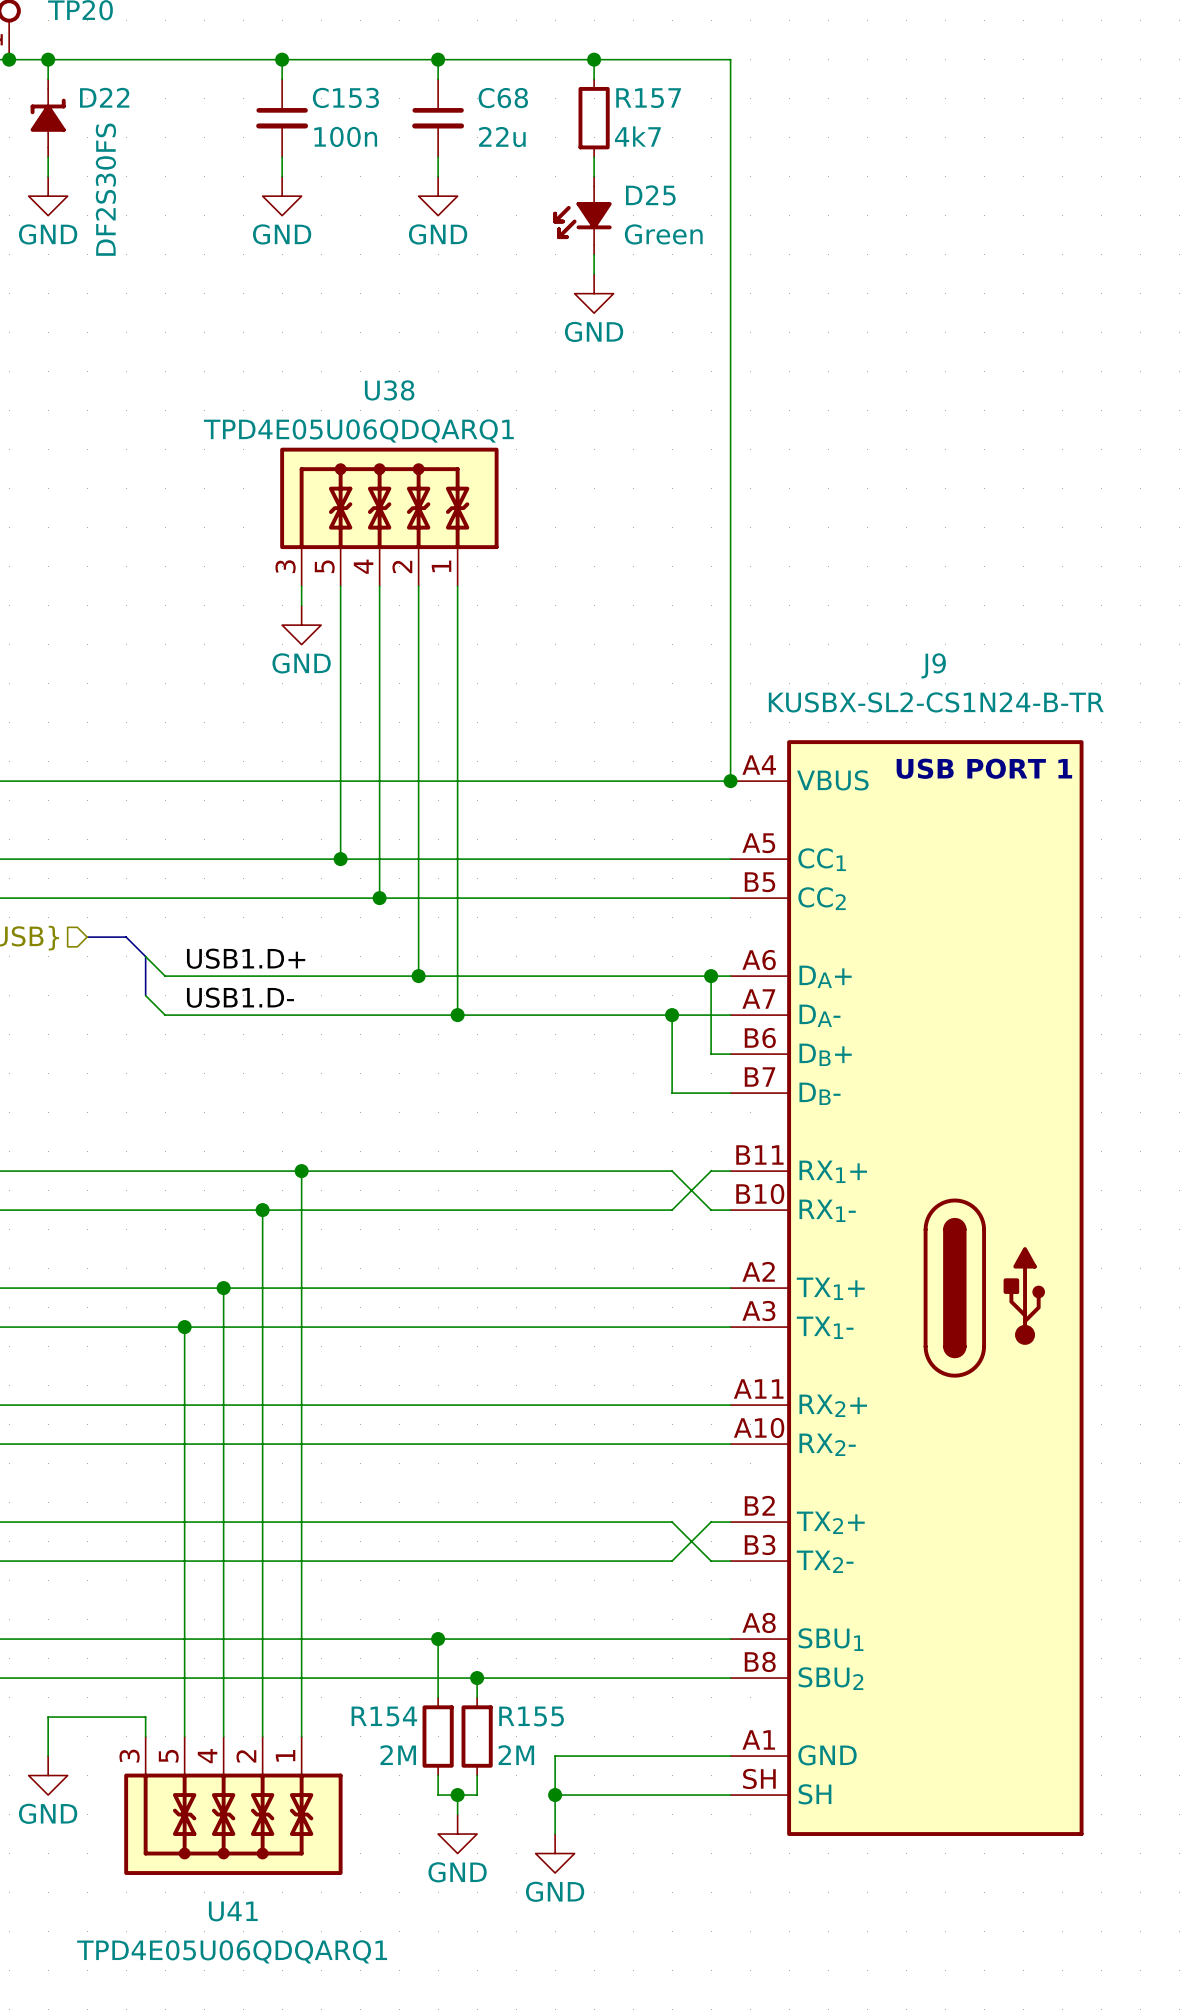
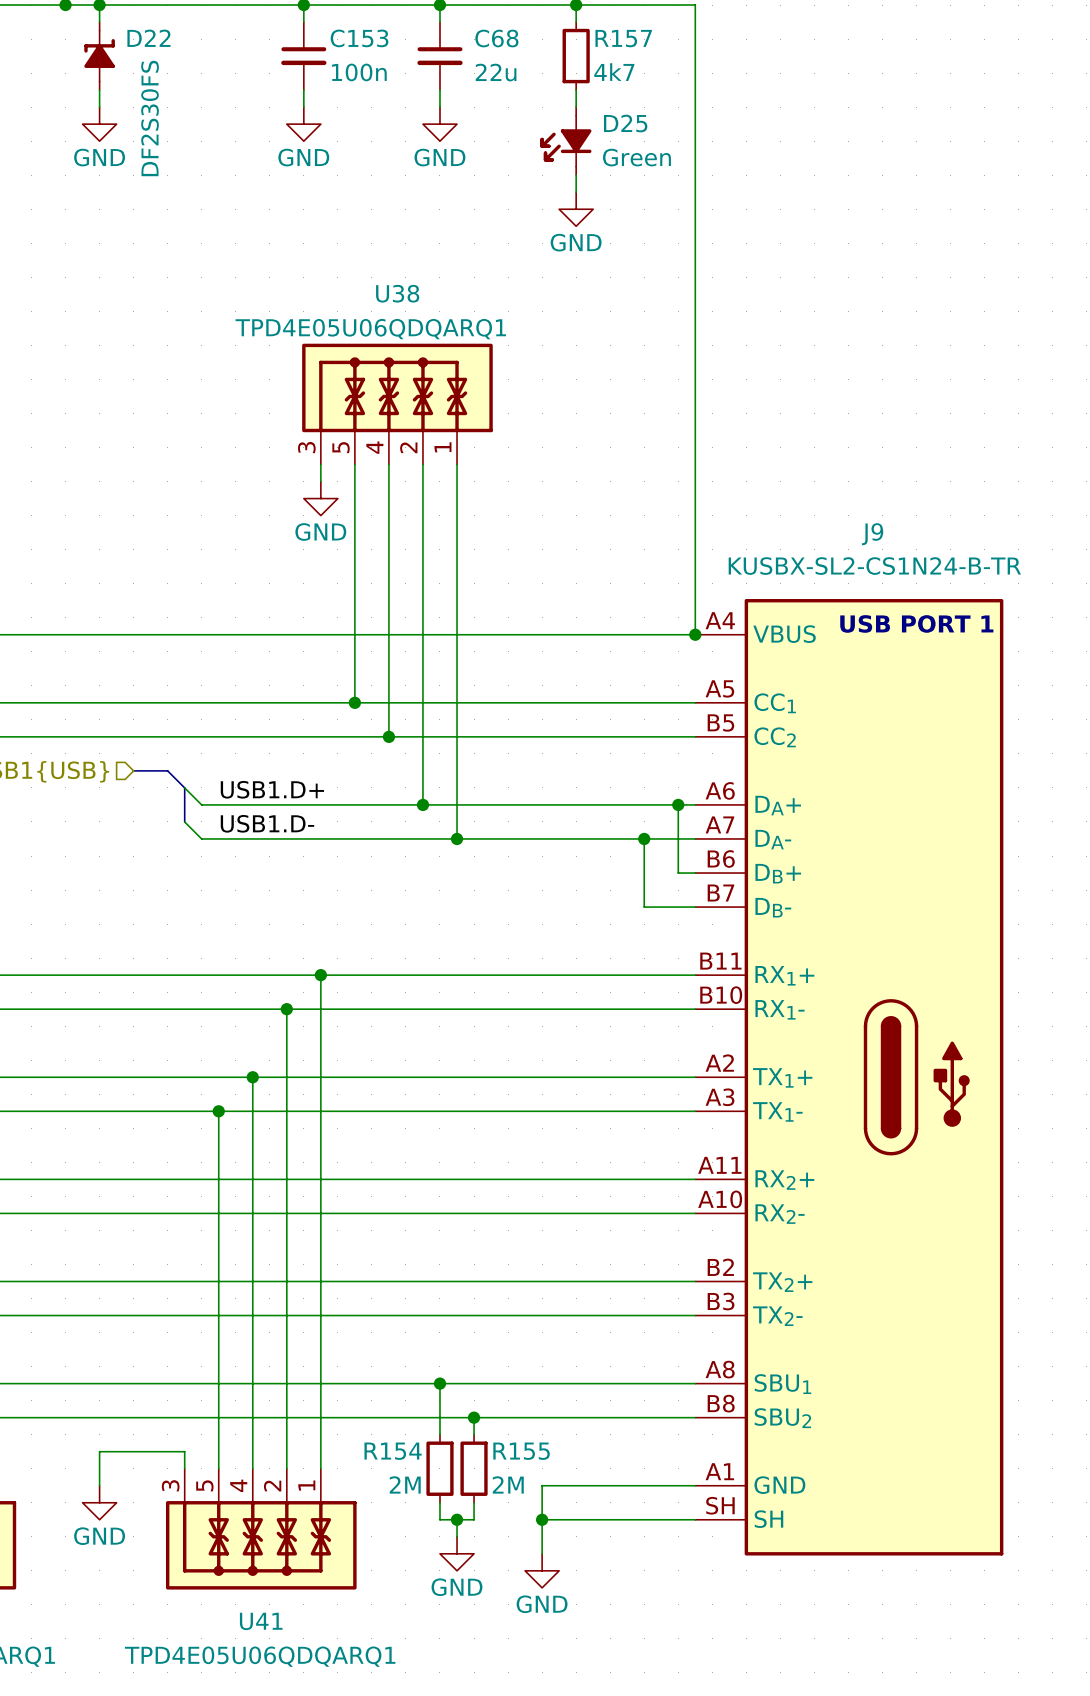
wire: (672, 1171) (711, 1210) -> (644, 975) (678, 975)
wire: (711, 1171) (672, 1210) -> (678, 1009) (644, 1009)
wire: (672, 1522) (711, 1561) -> (644, 1281) (678, 1281)
wire: (711, 1522) (672, 1561) -> (678, 1315) (644, 1315)

